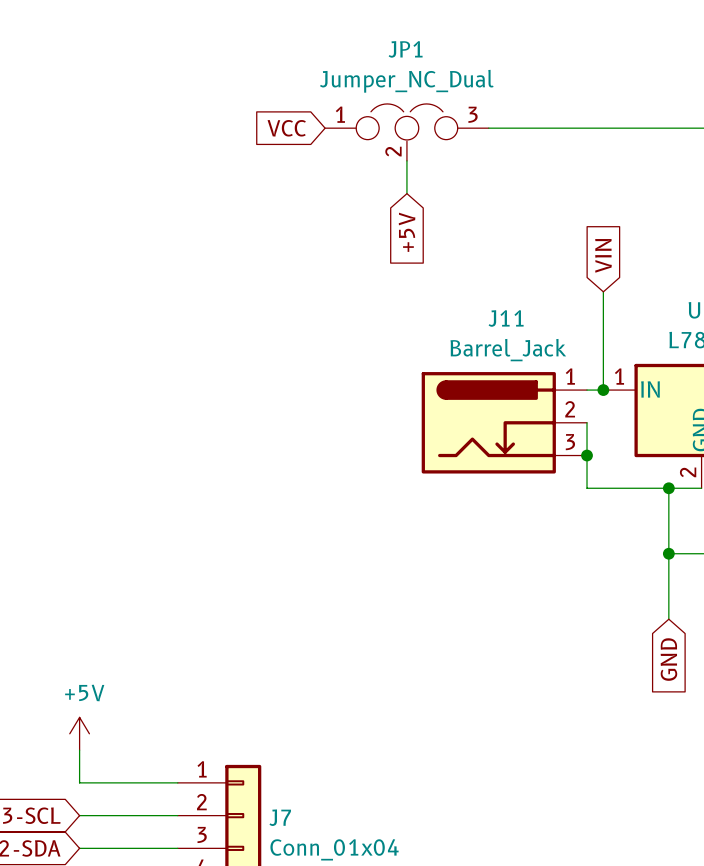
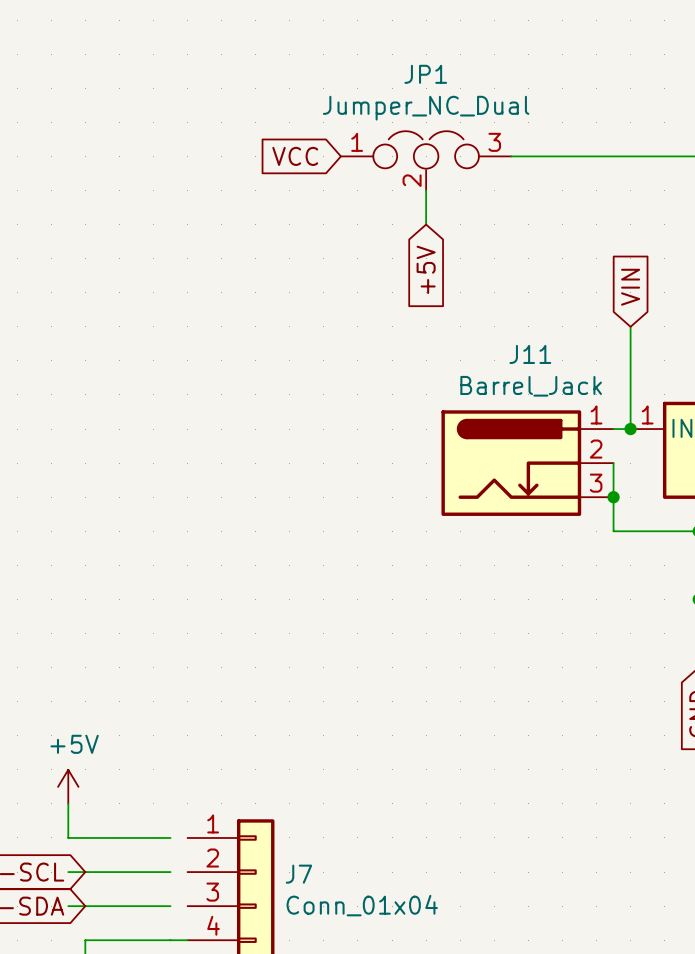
power symbol position: +5V (79, 733) -> +5V (68, 786)
wire: (79, 750) (79, 782) -> (68, 803) (68, 837) (85, 837)
wire: (161, 782) (177, 782) -> none
wire: (161, 815) (177, 815) -> (68, 872) (85, 872)
wire: (161, 848) (177, 848) -> (68, 906) (85, 906)

